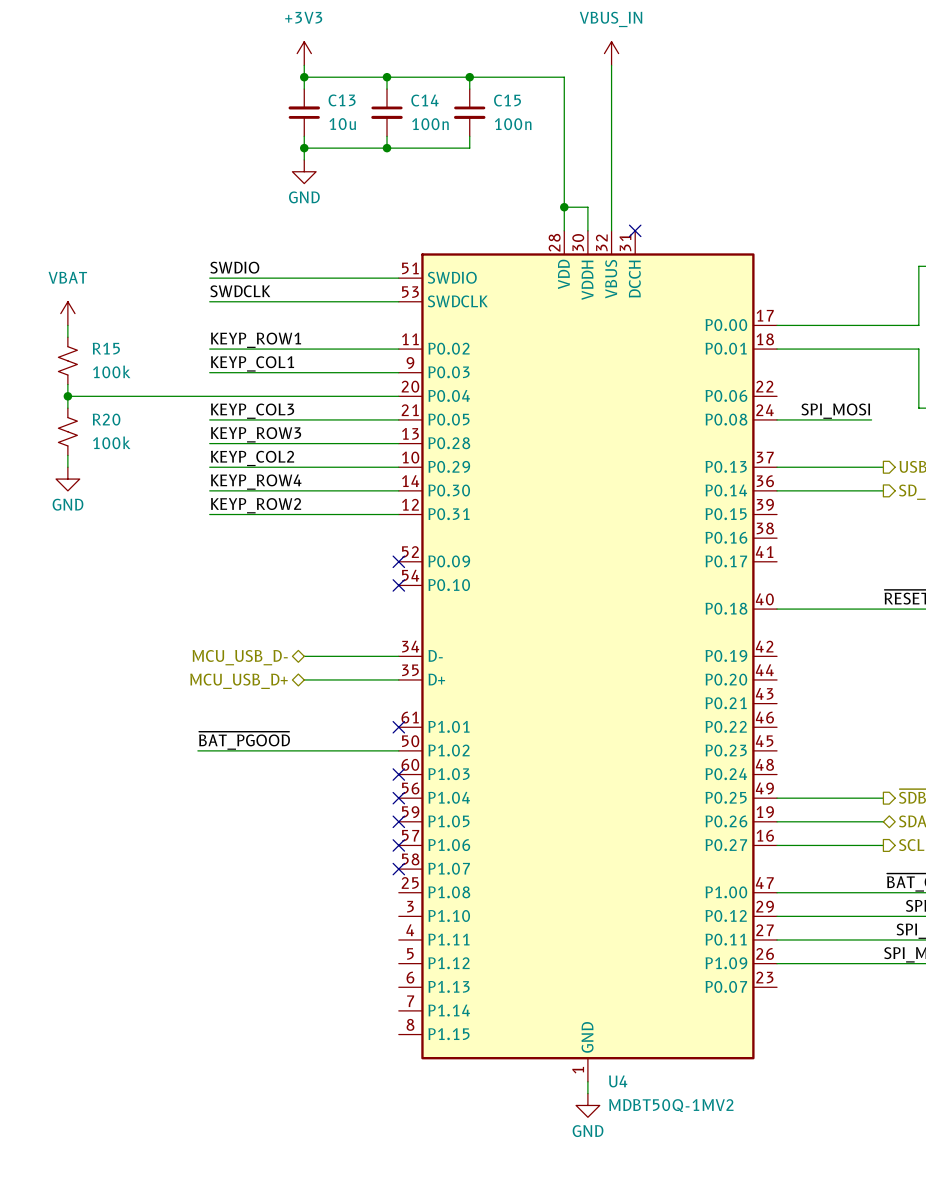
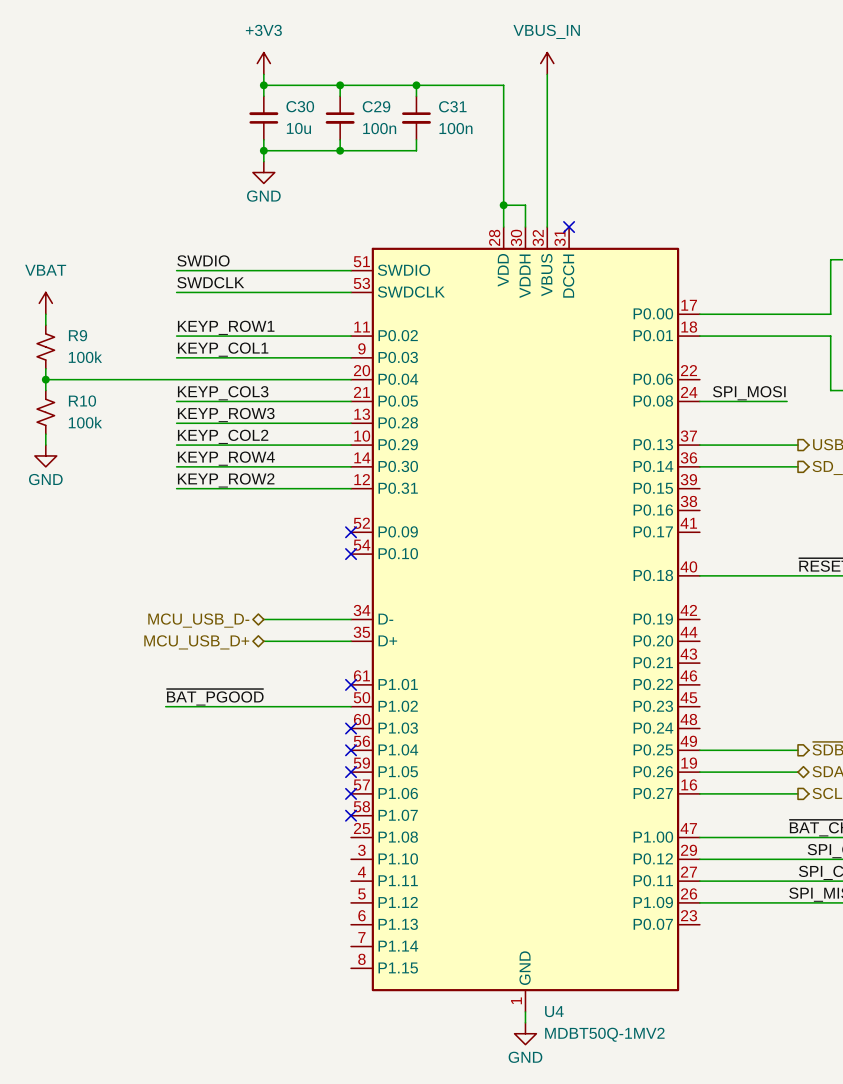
C13 name: C13 (342, 100) -> C30 (300, 106)
C14 name: C14 (424, 100) -> C29 (376, 106)
C15 name: C15 (507, 100) -> C31 (452, 106)
R15 name: R15 (106, 348) -> R9 (78, 335)
R20 name: R20 (106, 419) -> R10 (82, 401)

